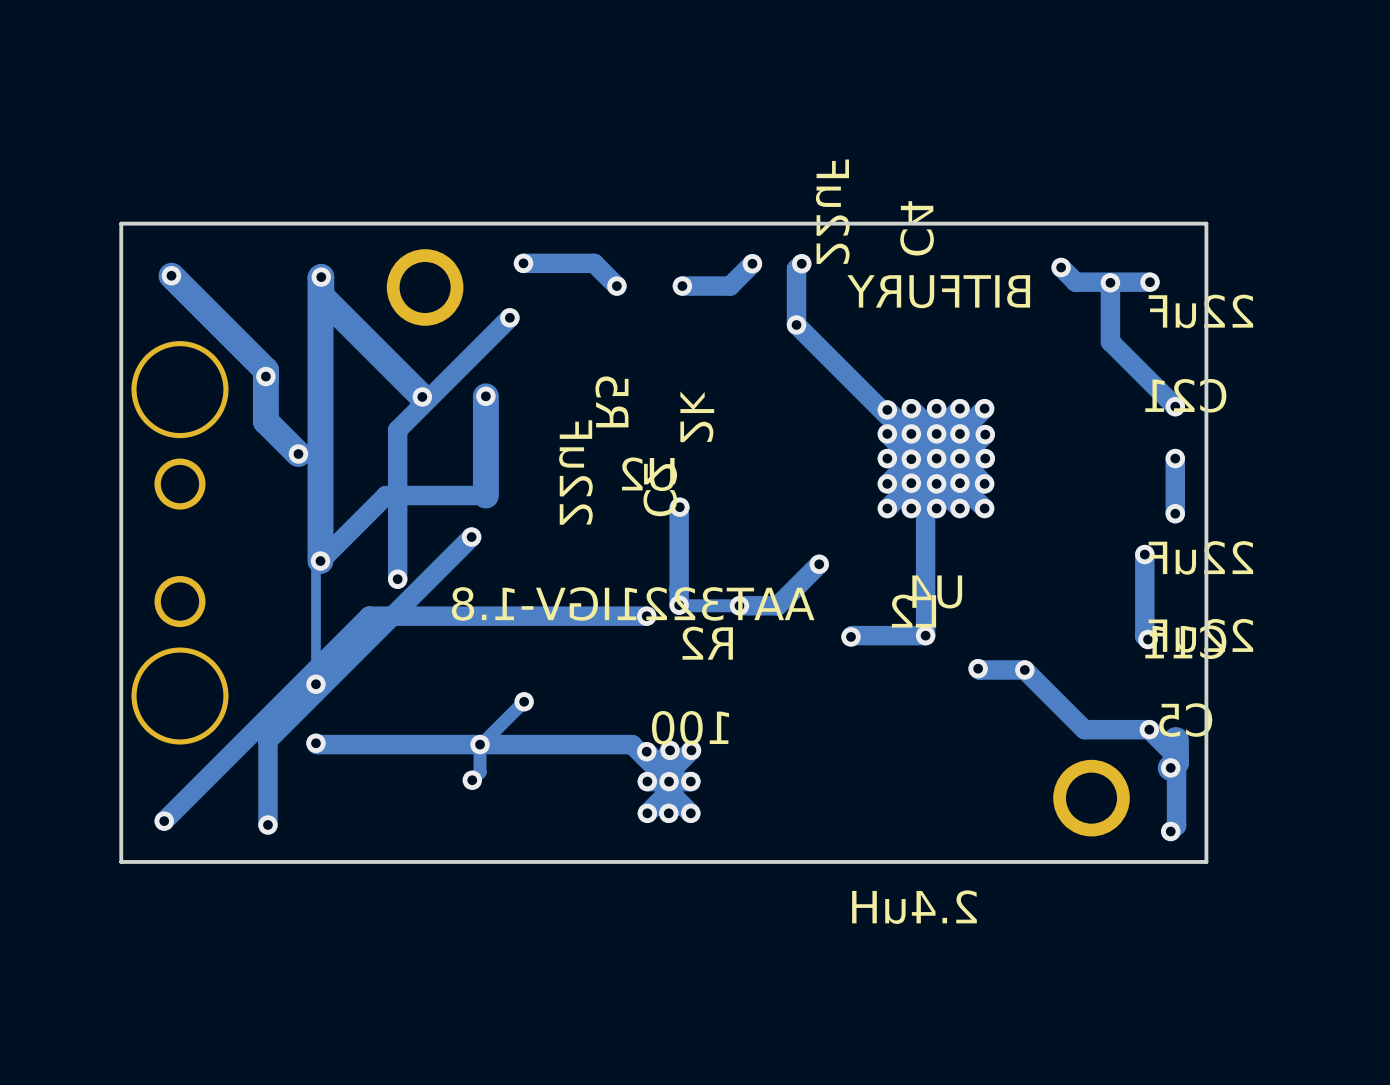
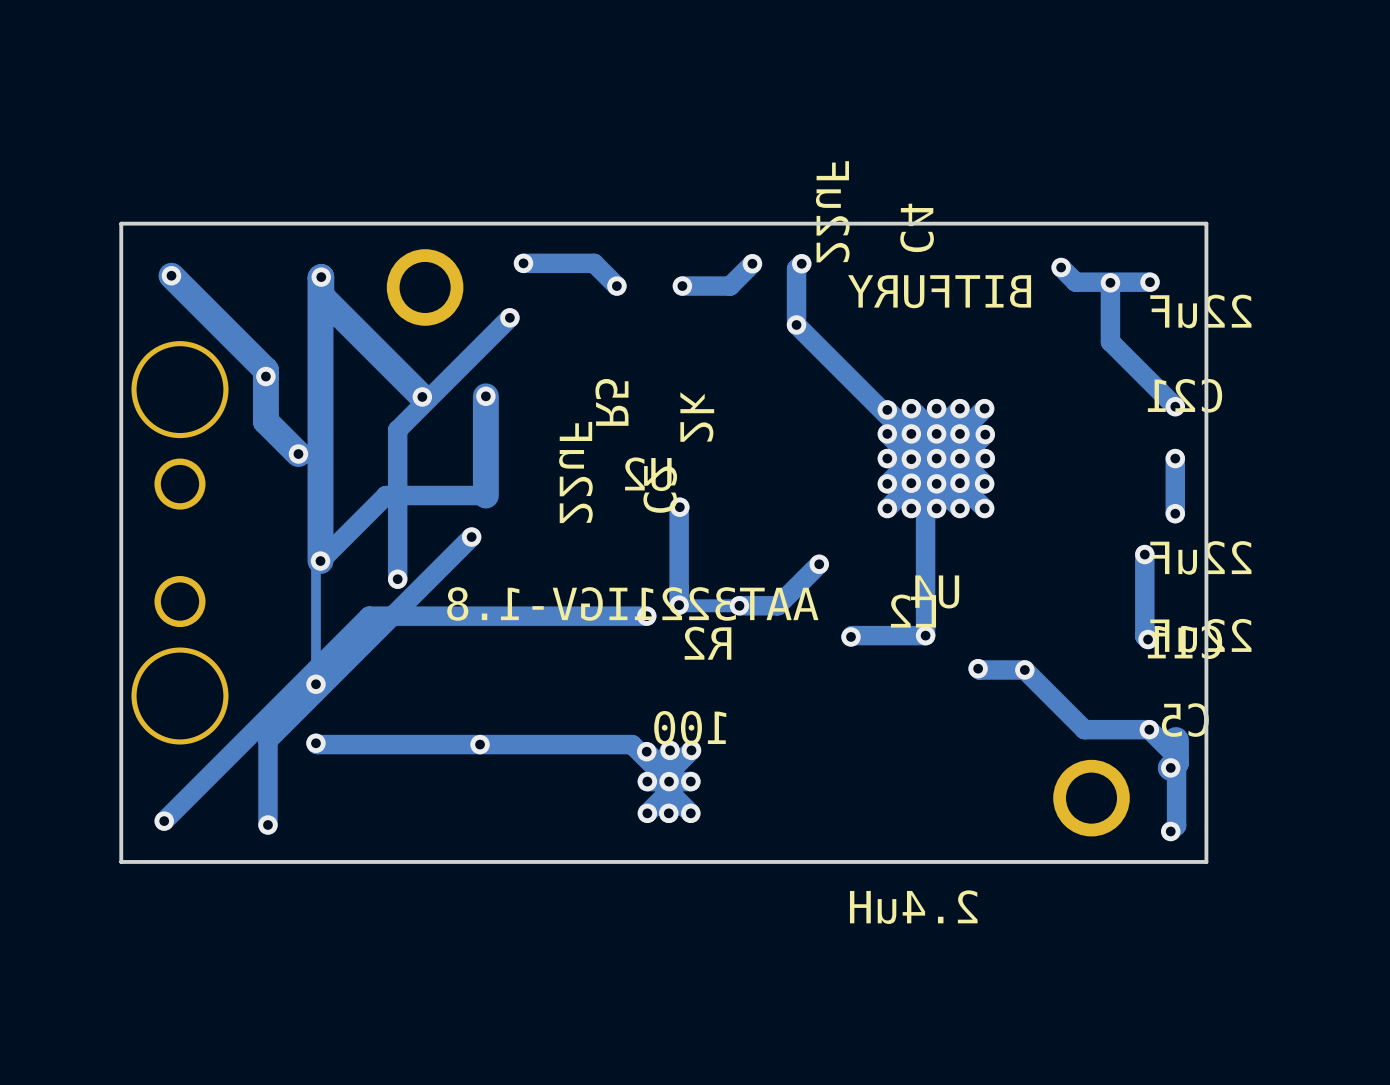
track: (524, 701) (480, 744) (480, 772) (472, 780) -> none
via: (524, 701) -> none
via: (472, 780) -> none

